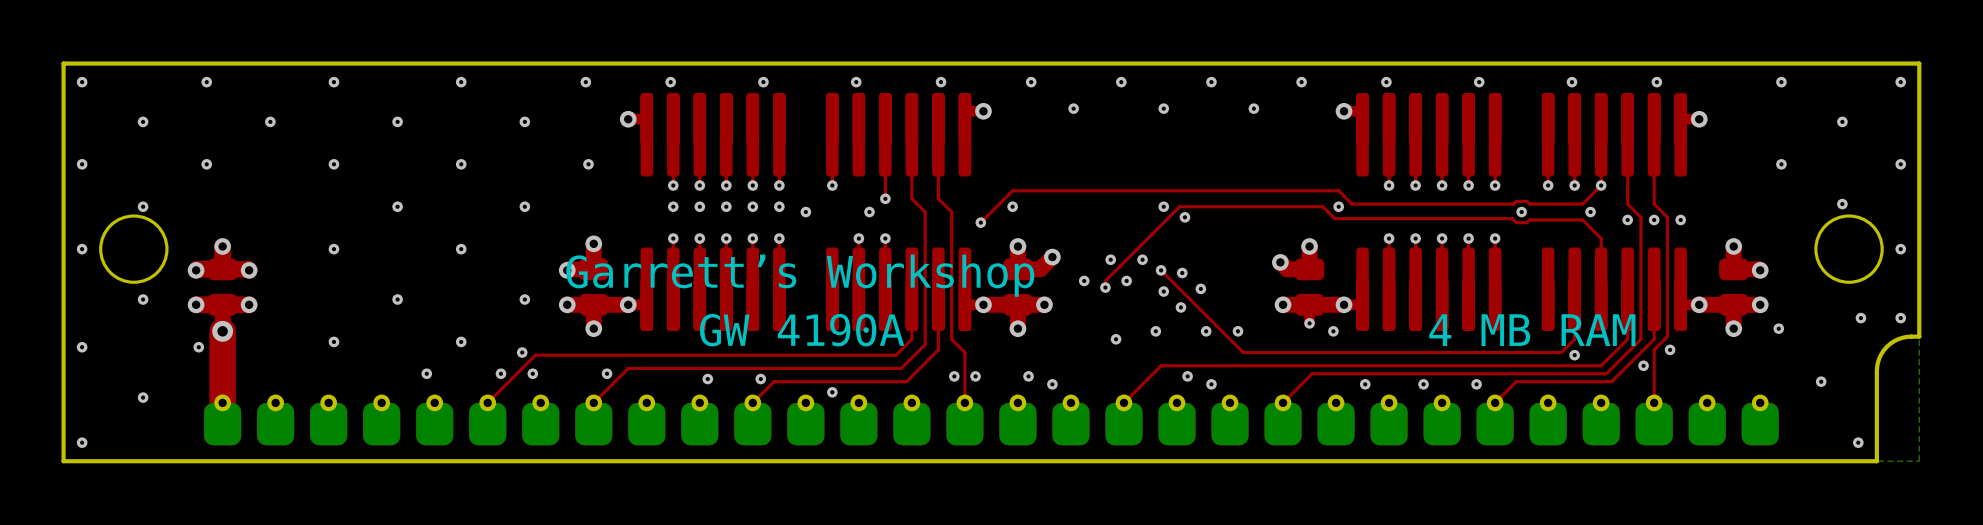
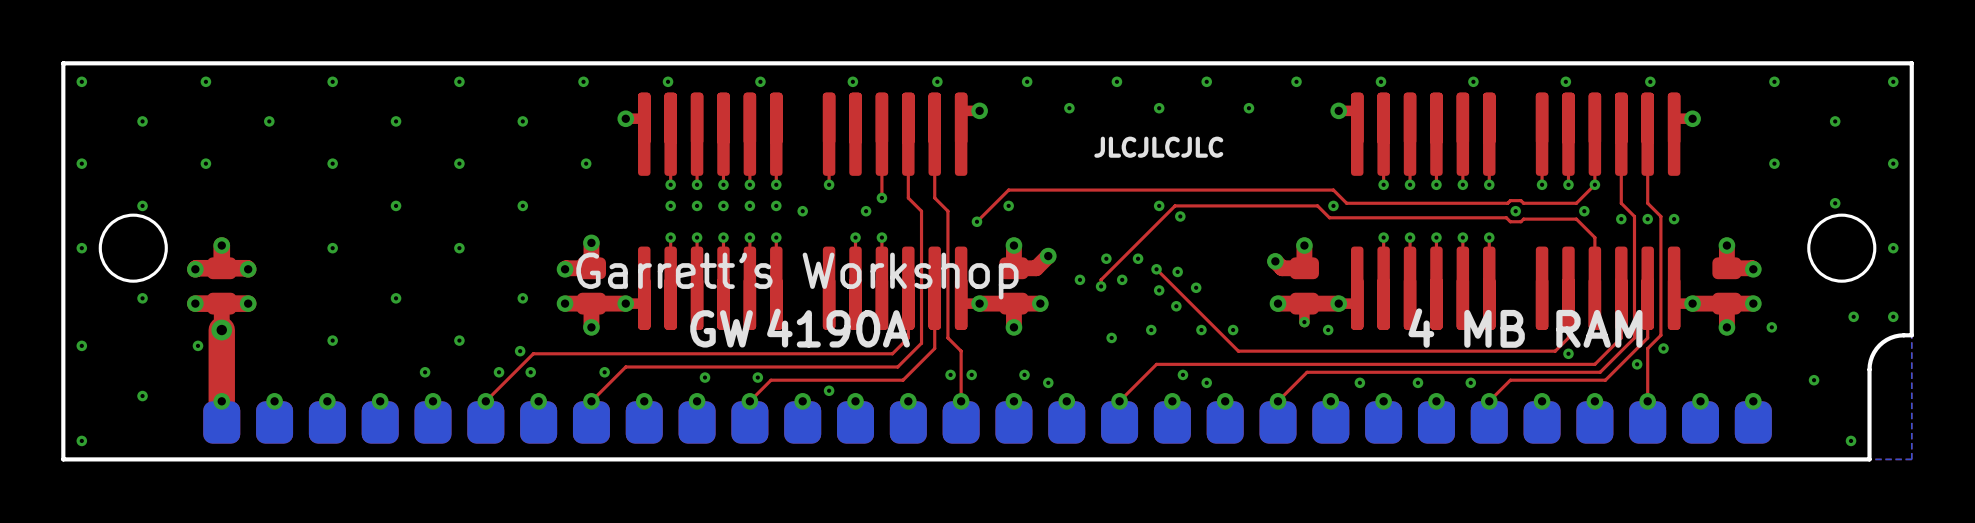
text: none -> JLCJLCJLC (1158, 147)

